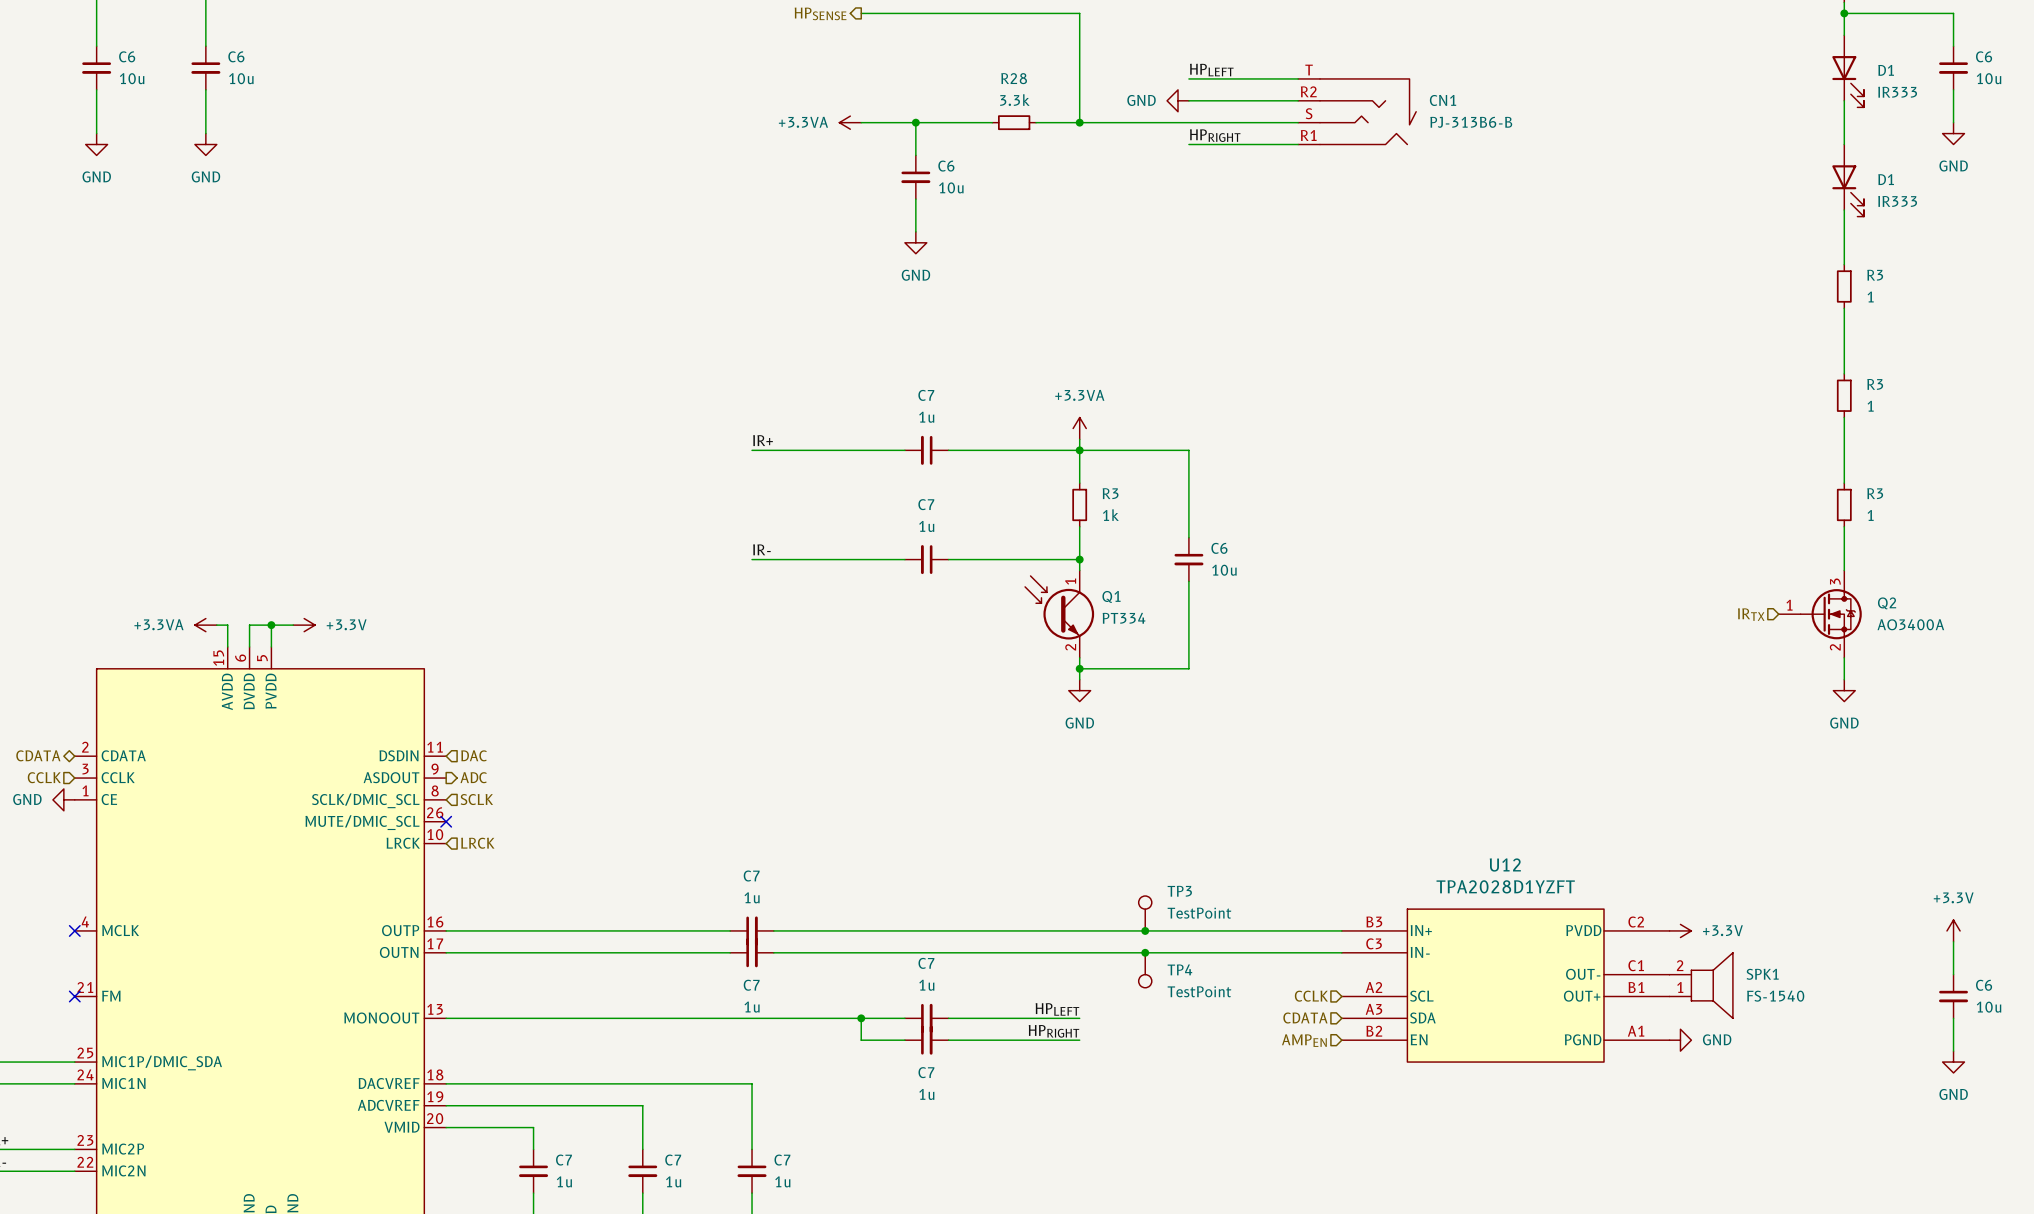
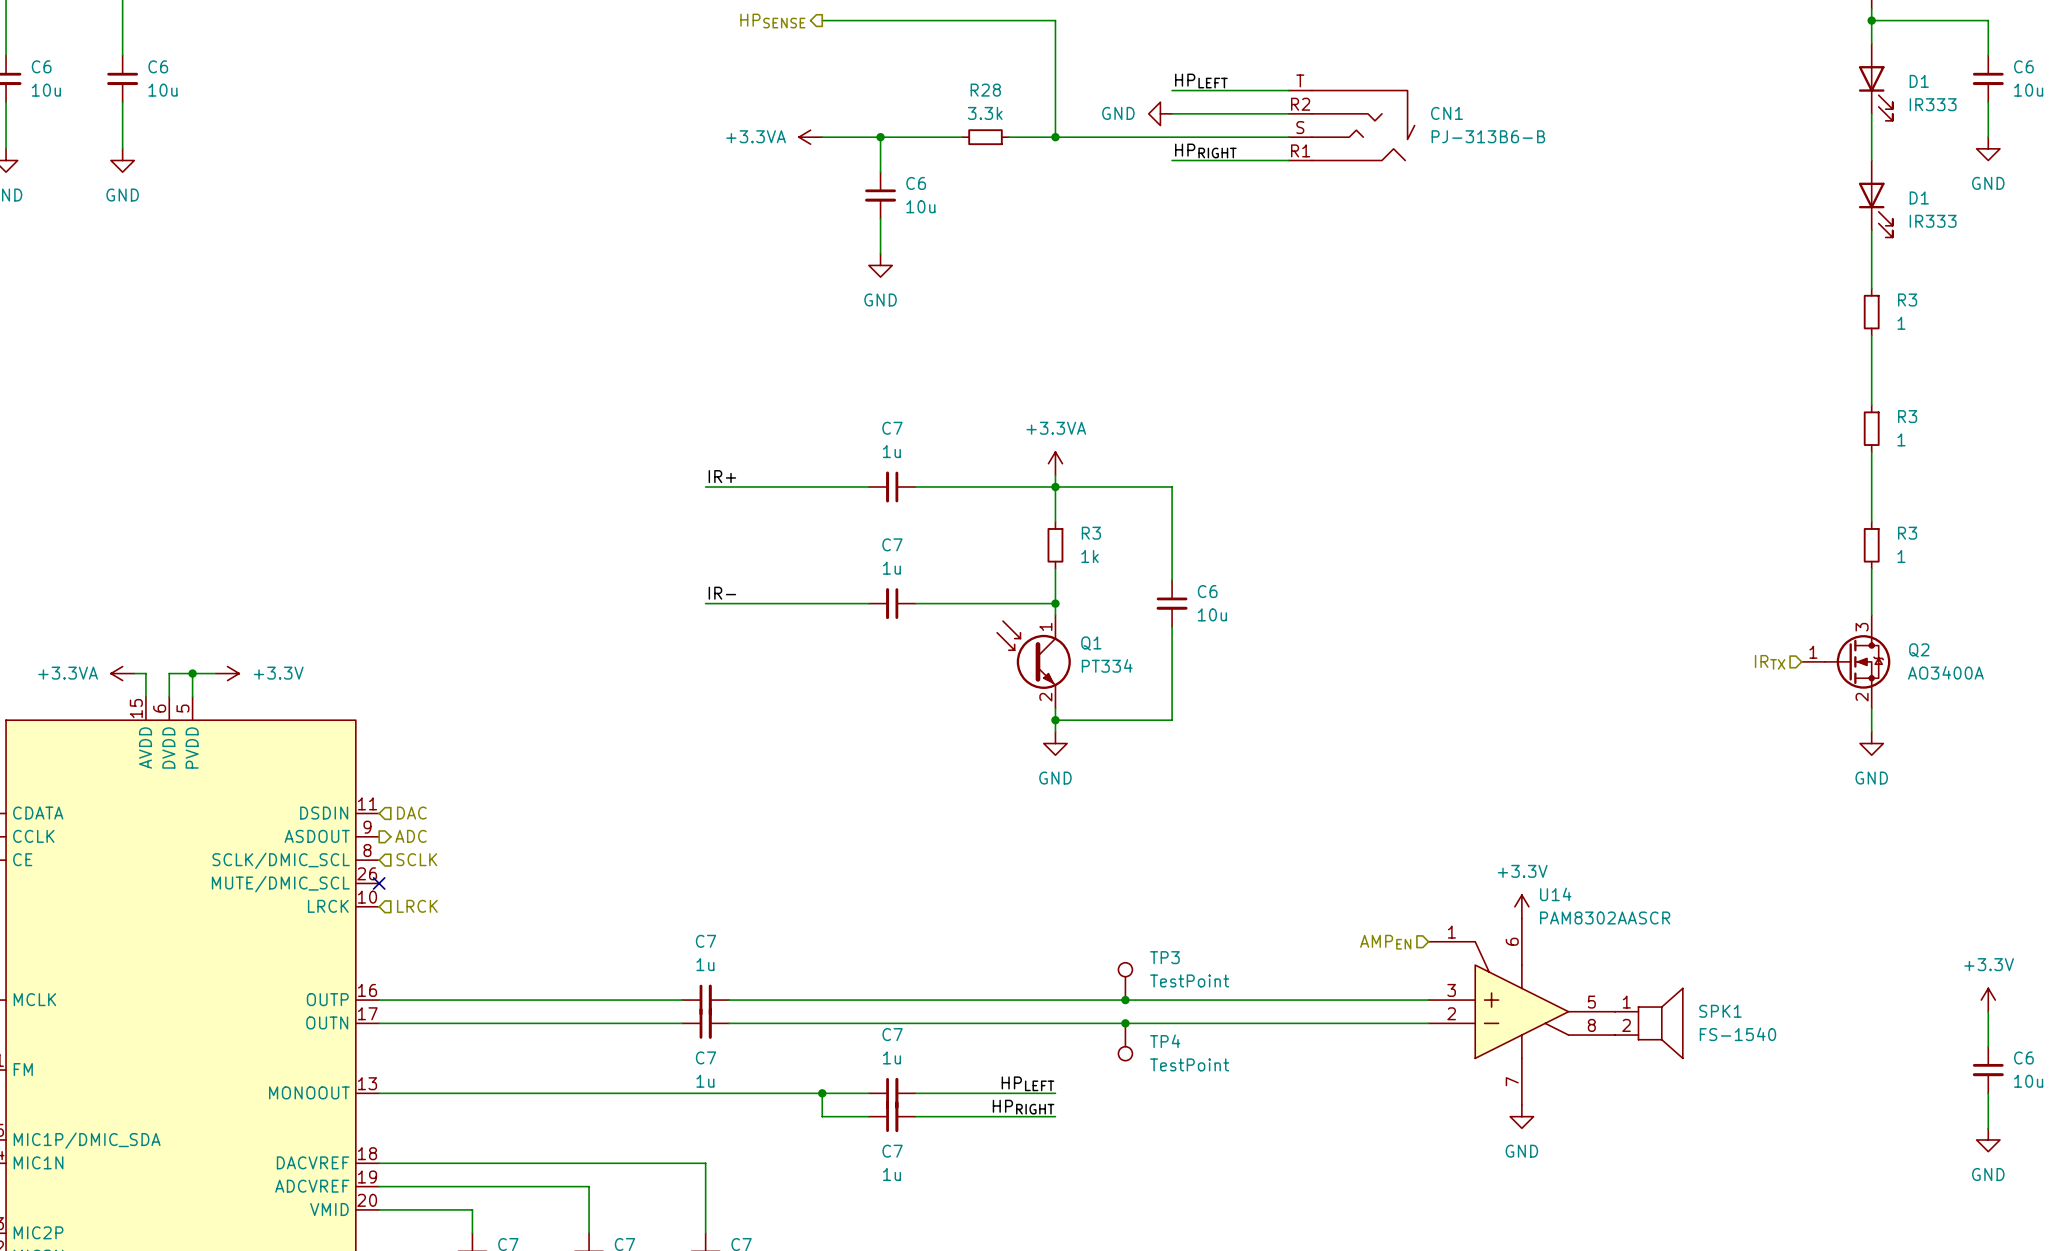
power symbol rotation: 0° (1680, 930) -> 90° counterclockwise (1521, 906)
power symbol position: +3.3V (1680, 930) -> +3.3V (1521, 906)
power symbol text position: +3.3V (1722, 930) -> +3.3V (1522, 871)
U14: none -> PAM8302AASCR (1521, 1011)
U12: TPA2028D1YZFT (1505, 985) -> none
SPK1 position: (1701, 985) -> (1648, 1023)
SPK1 flip: as is (1712, 985) -> up-down (1660, 1023)
hierarchical label: CCLK (1311, 996) -> none
hierarchical label: CDATA (1305, 1017) -> none
hierarchical label position: AMPEN (1304, 1040) -> AMPEN (1385, 942)
power symbol rotation: 0° (1680, 1040) -> 90° clockwise (1521, 1116)
power symbol position: GND (1680, 1040) -> GND (1521, 1116)

